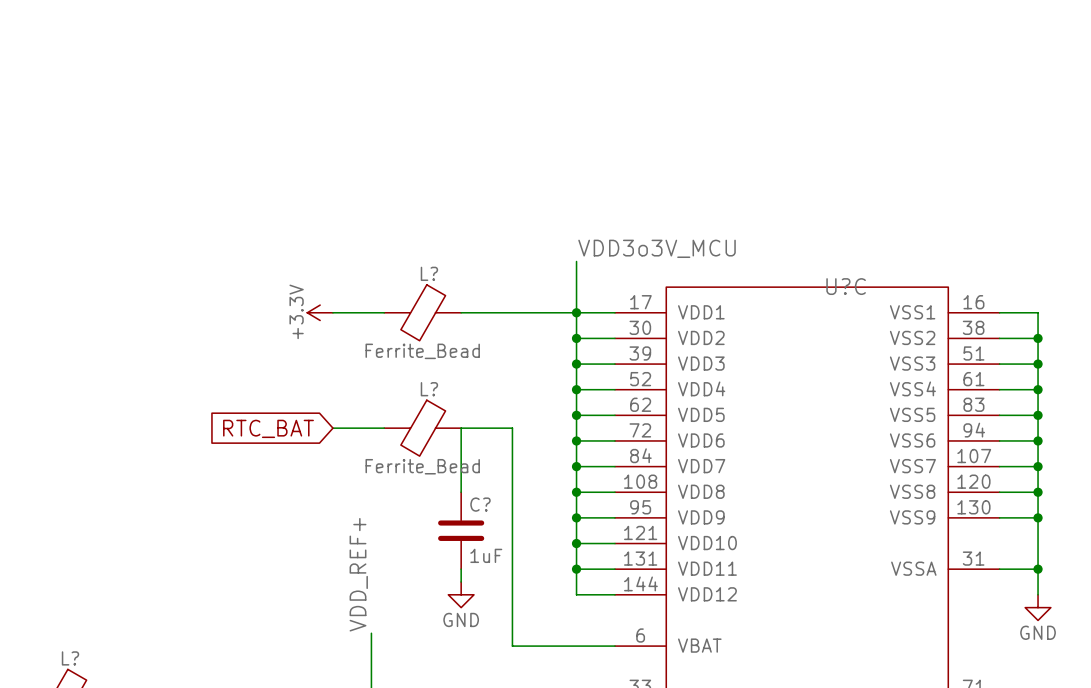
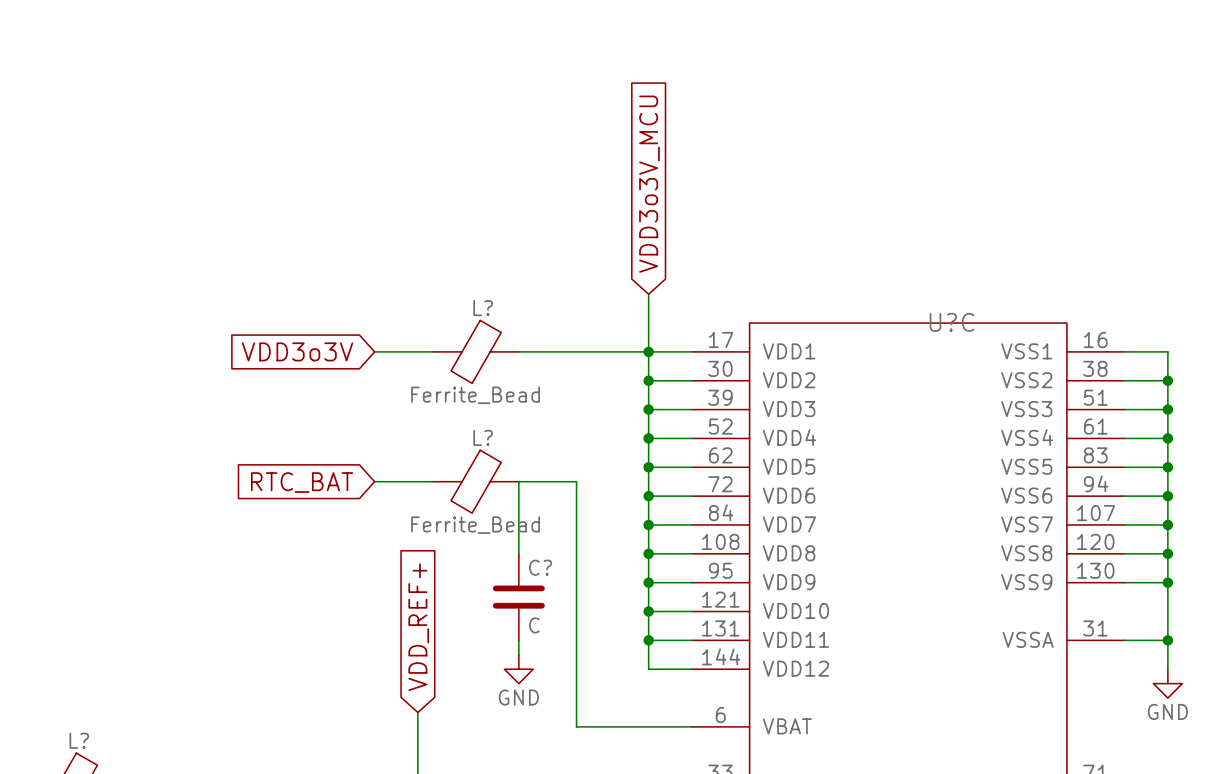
global label: none -> VDD3o3V_MCU (649, 184)
label: VDD3o3V_MCU (657, 248) -> none
global label: none -> VDD3o3V (297, 351)
power symbol: +3.3V (320, 312) -> none
C? value: 1uF (486, 555) -> C (534, 625)
global label: none -> VDD_REF+ (418, 627)
label: VDD_REF+ (358, 574) -> none

